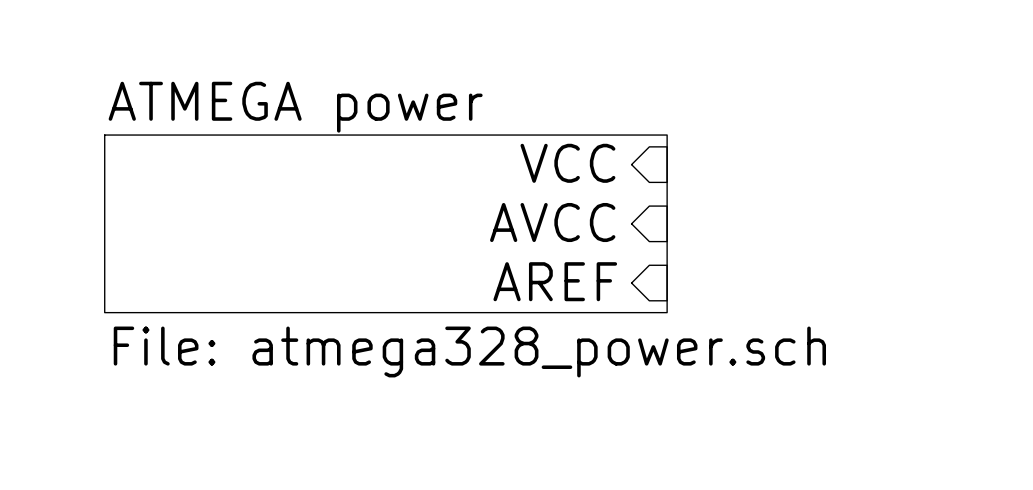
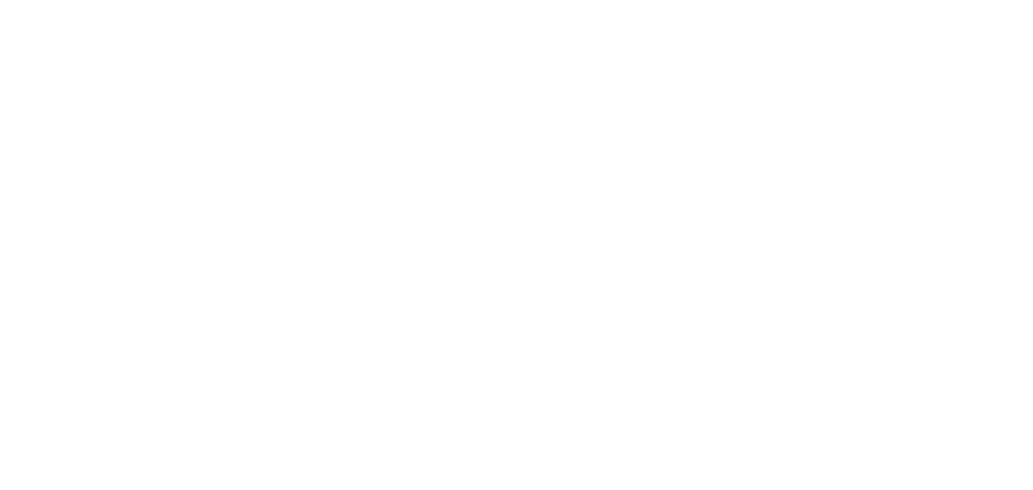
sheet pin: VCC (567, 163) -> none
sheet pin: AVCC (552, 222) -> none
sheet ATMEGA power: File: atmega328_power.sch (385, 223) -> none
sheet pin: AREF (555, 281) -> none

